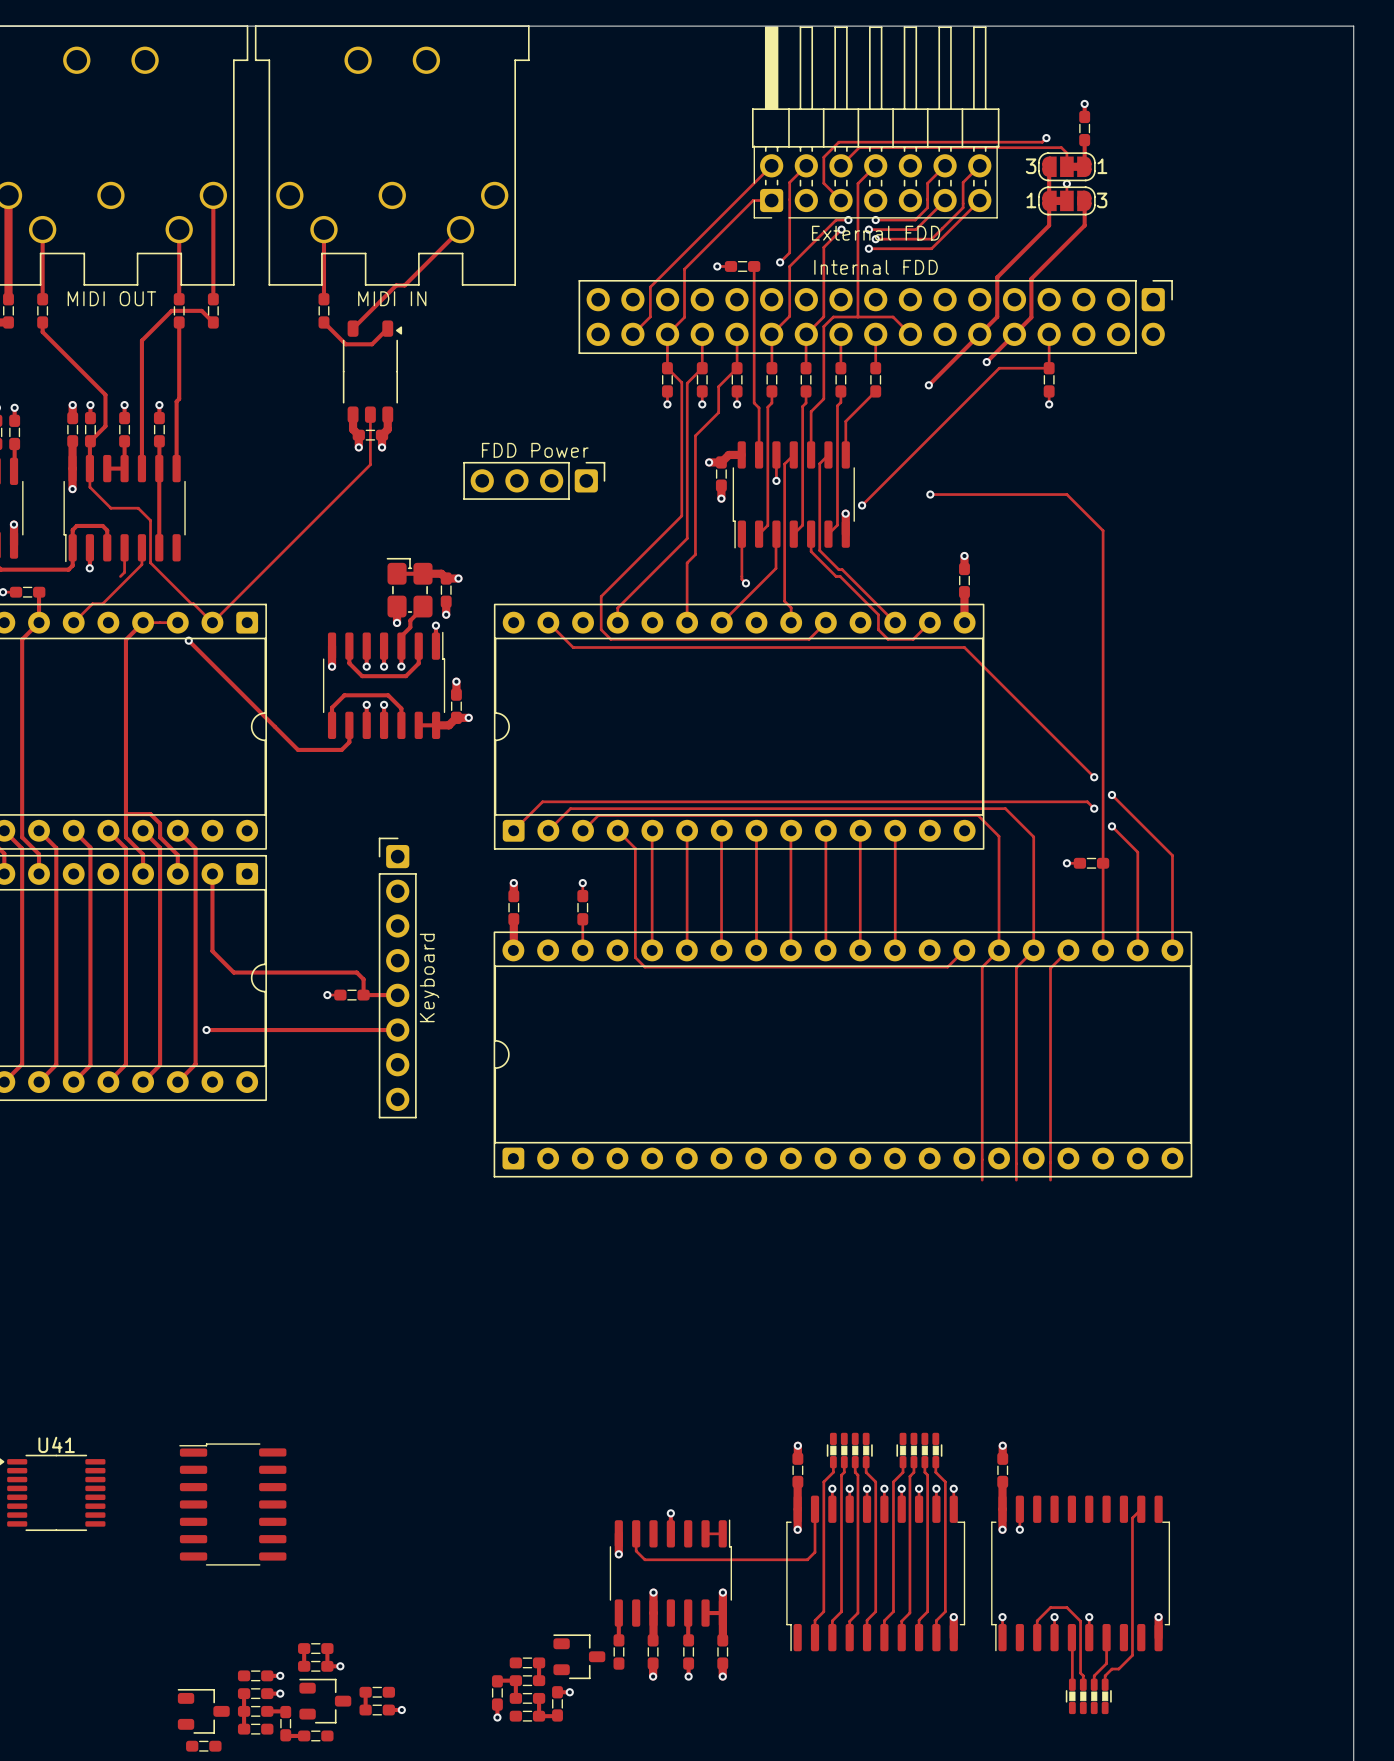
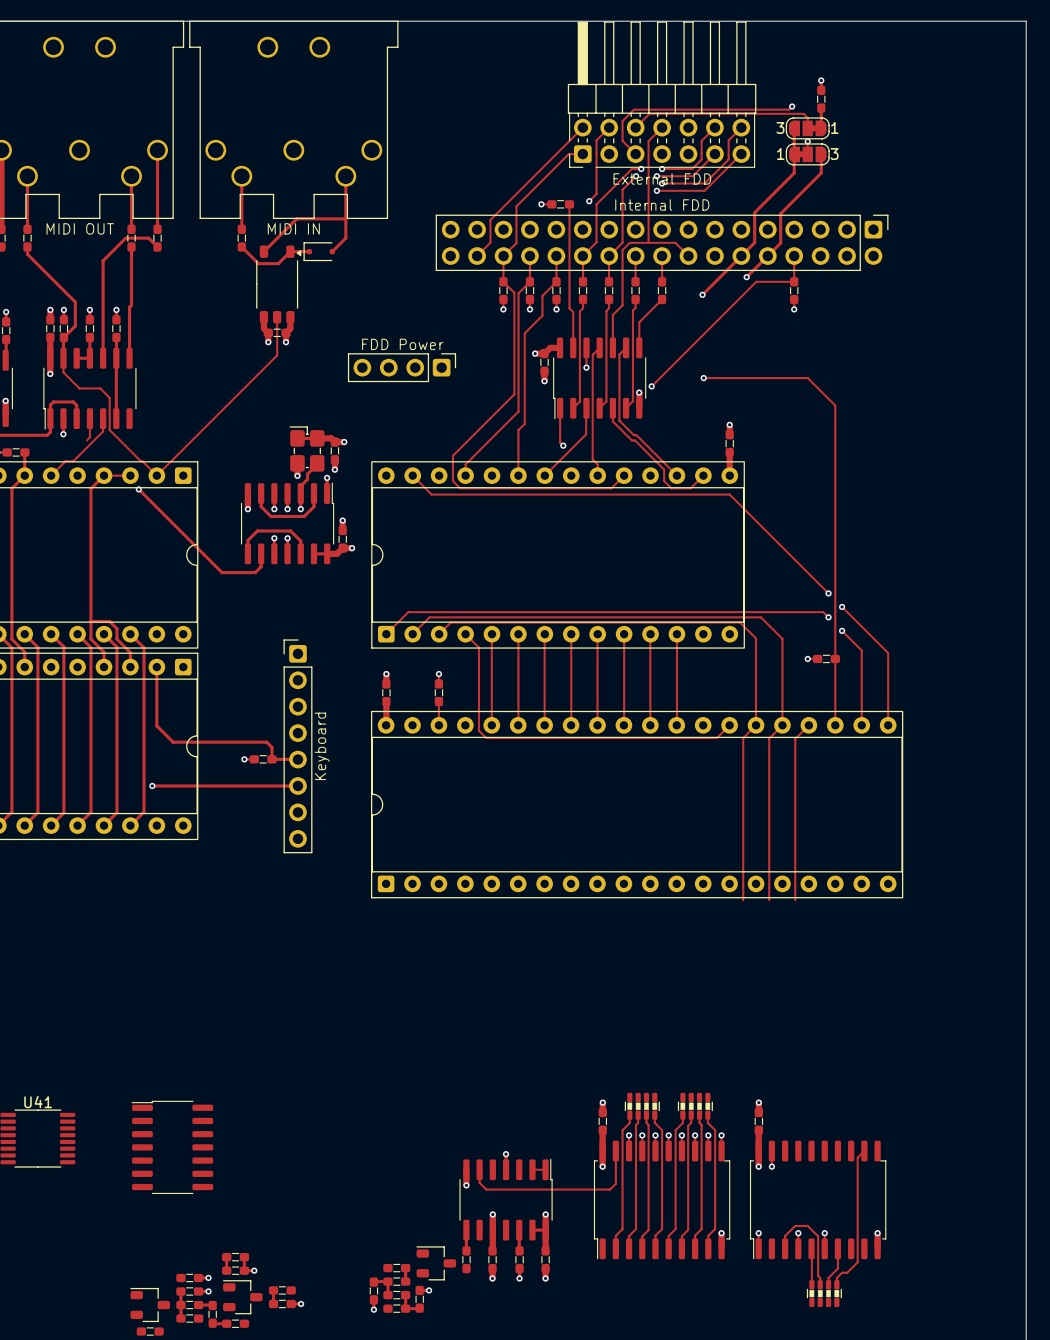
track: (460, 229) (404, 285) (396, 285) -> (345, 218) (296, 218)
track: none -> (345, 176) (345, 238) (332, 251)
track: none -> (290, 251) (309, 251)
part: none -> (319, 251)

